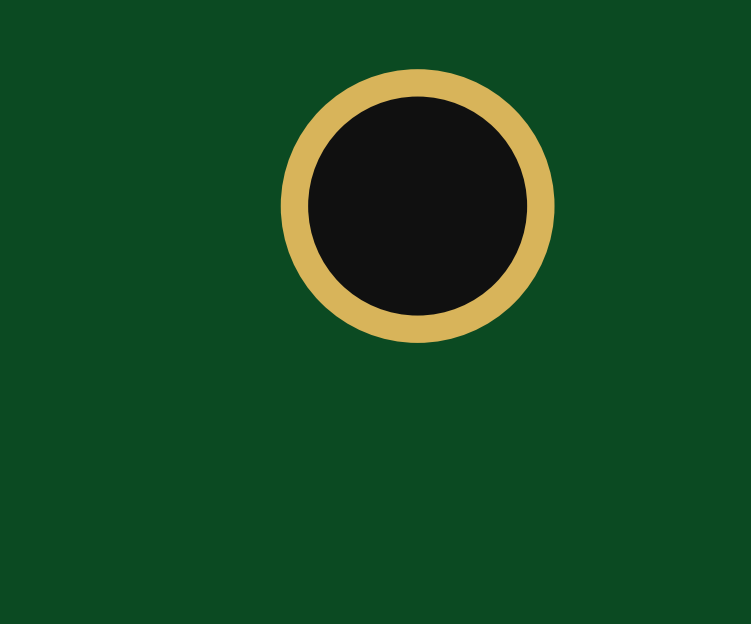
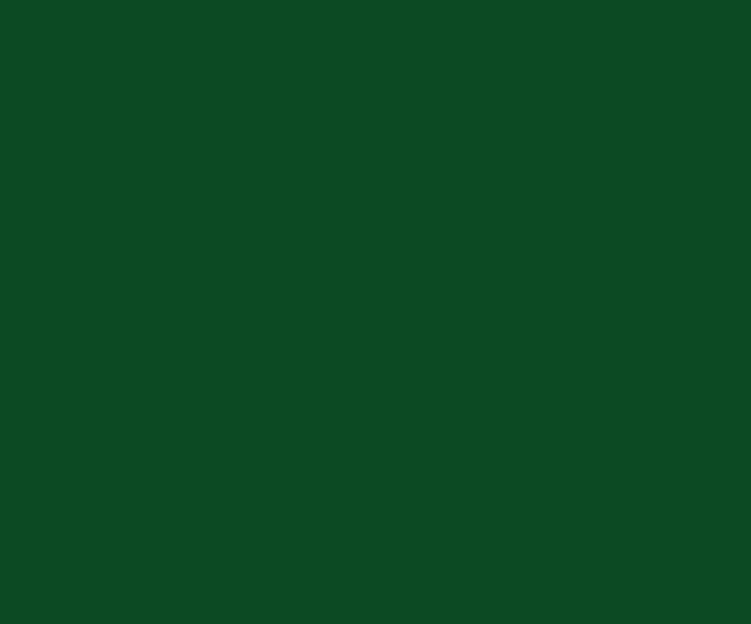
part: (417, 206) -> none

